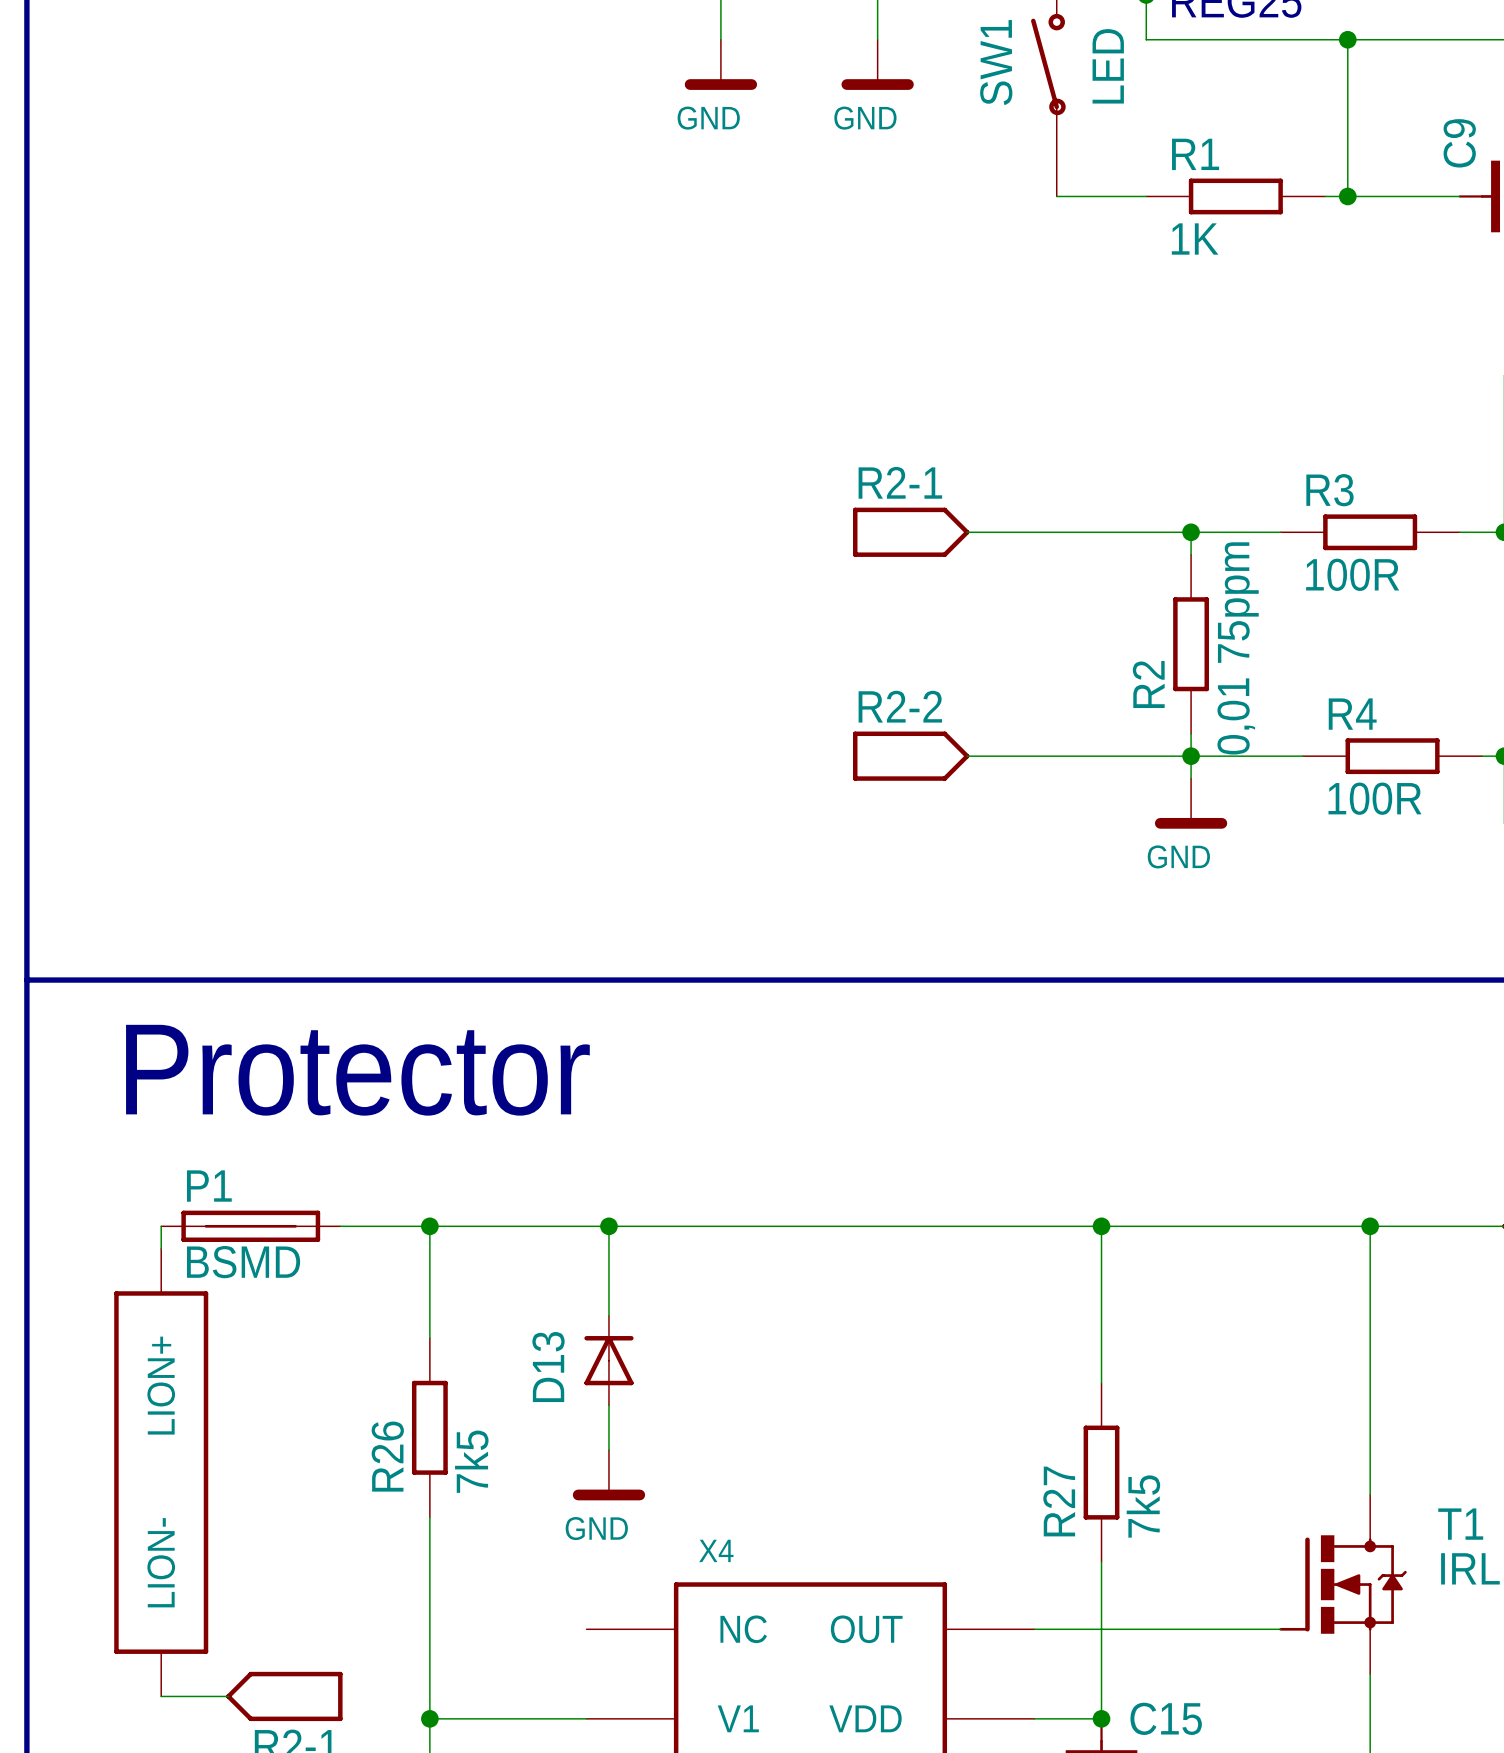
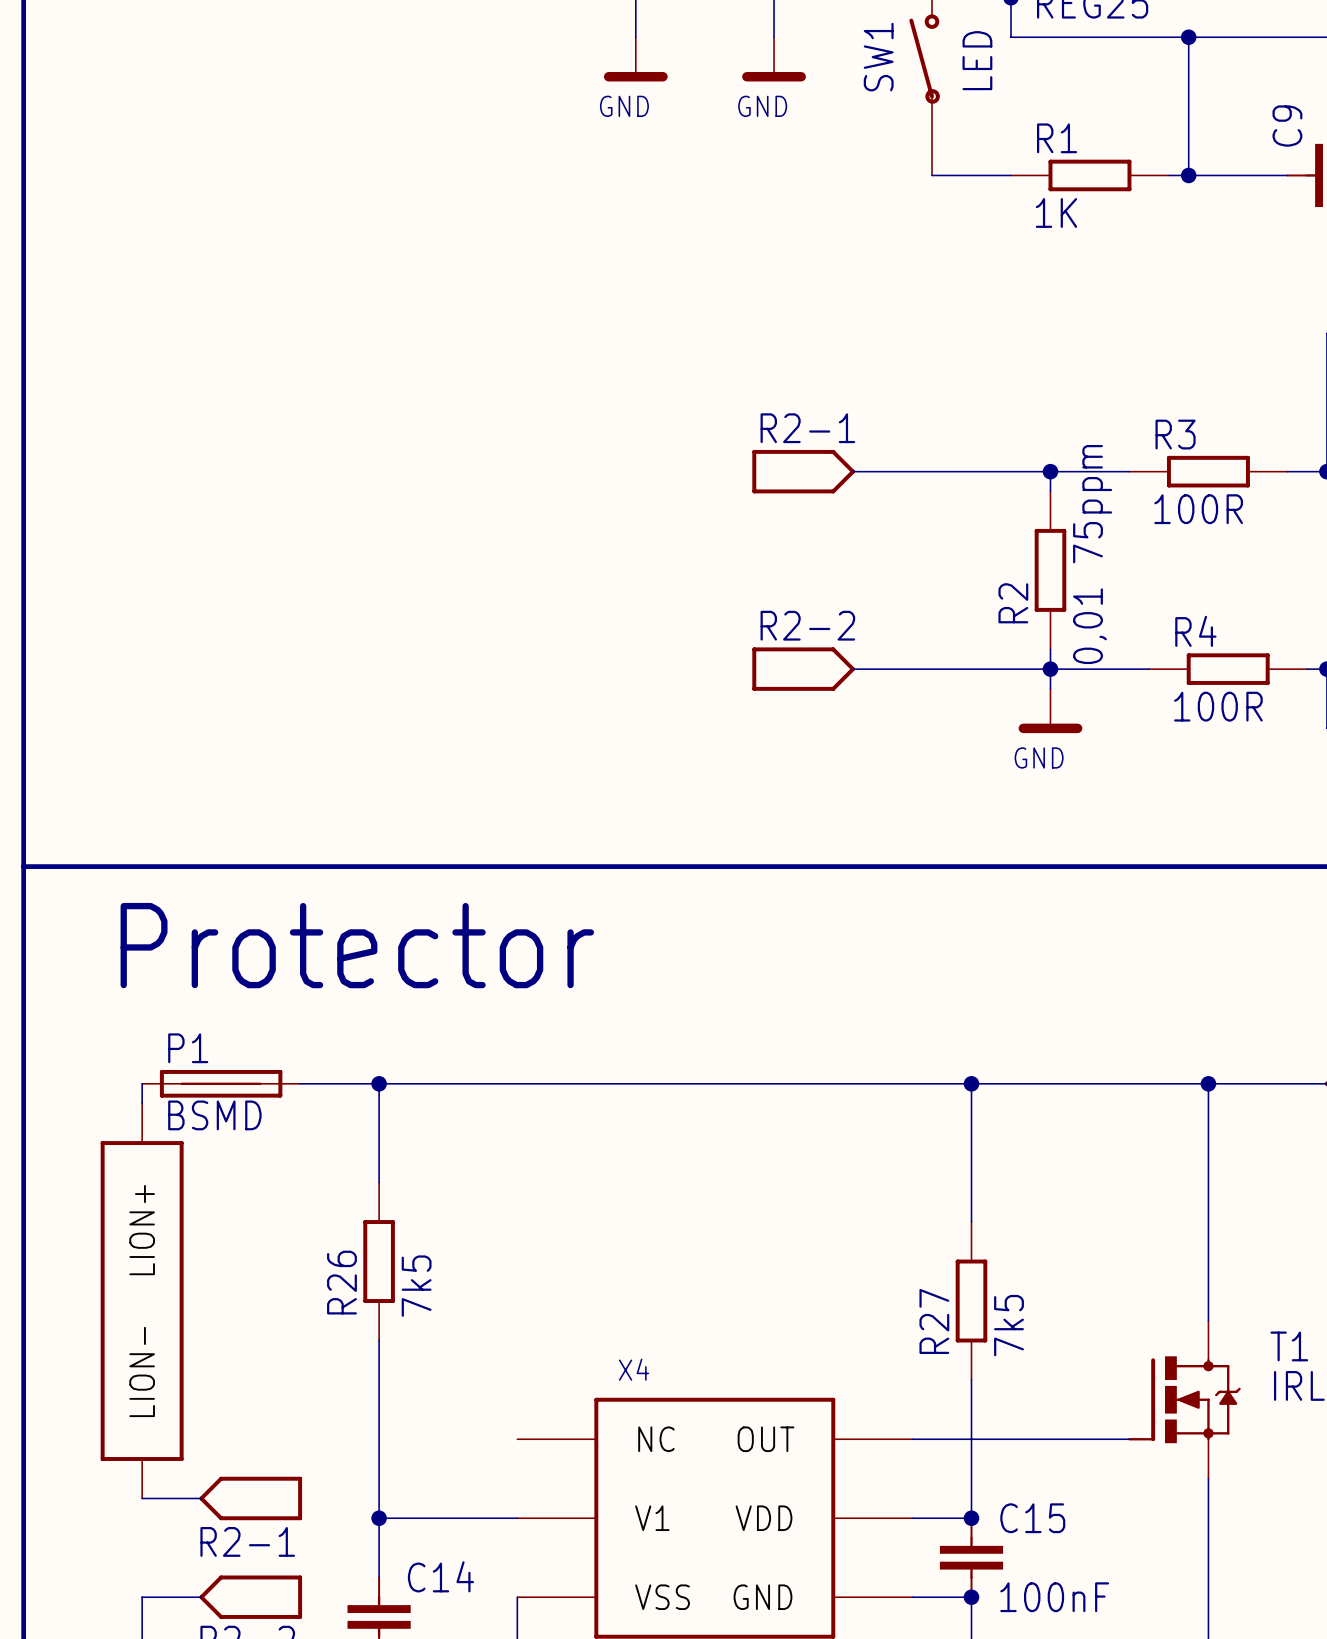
wire: (608, 1226) (608, 1315) -> none
junction: (608, 1226) -> none
D13: (608, 1360) -> none
wire: (608, 1405) (608, 1450) -> none
power symbol: (608, 1475) -> none

